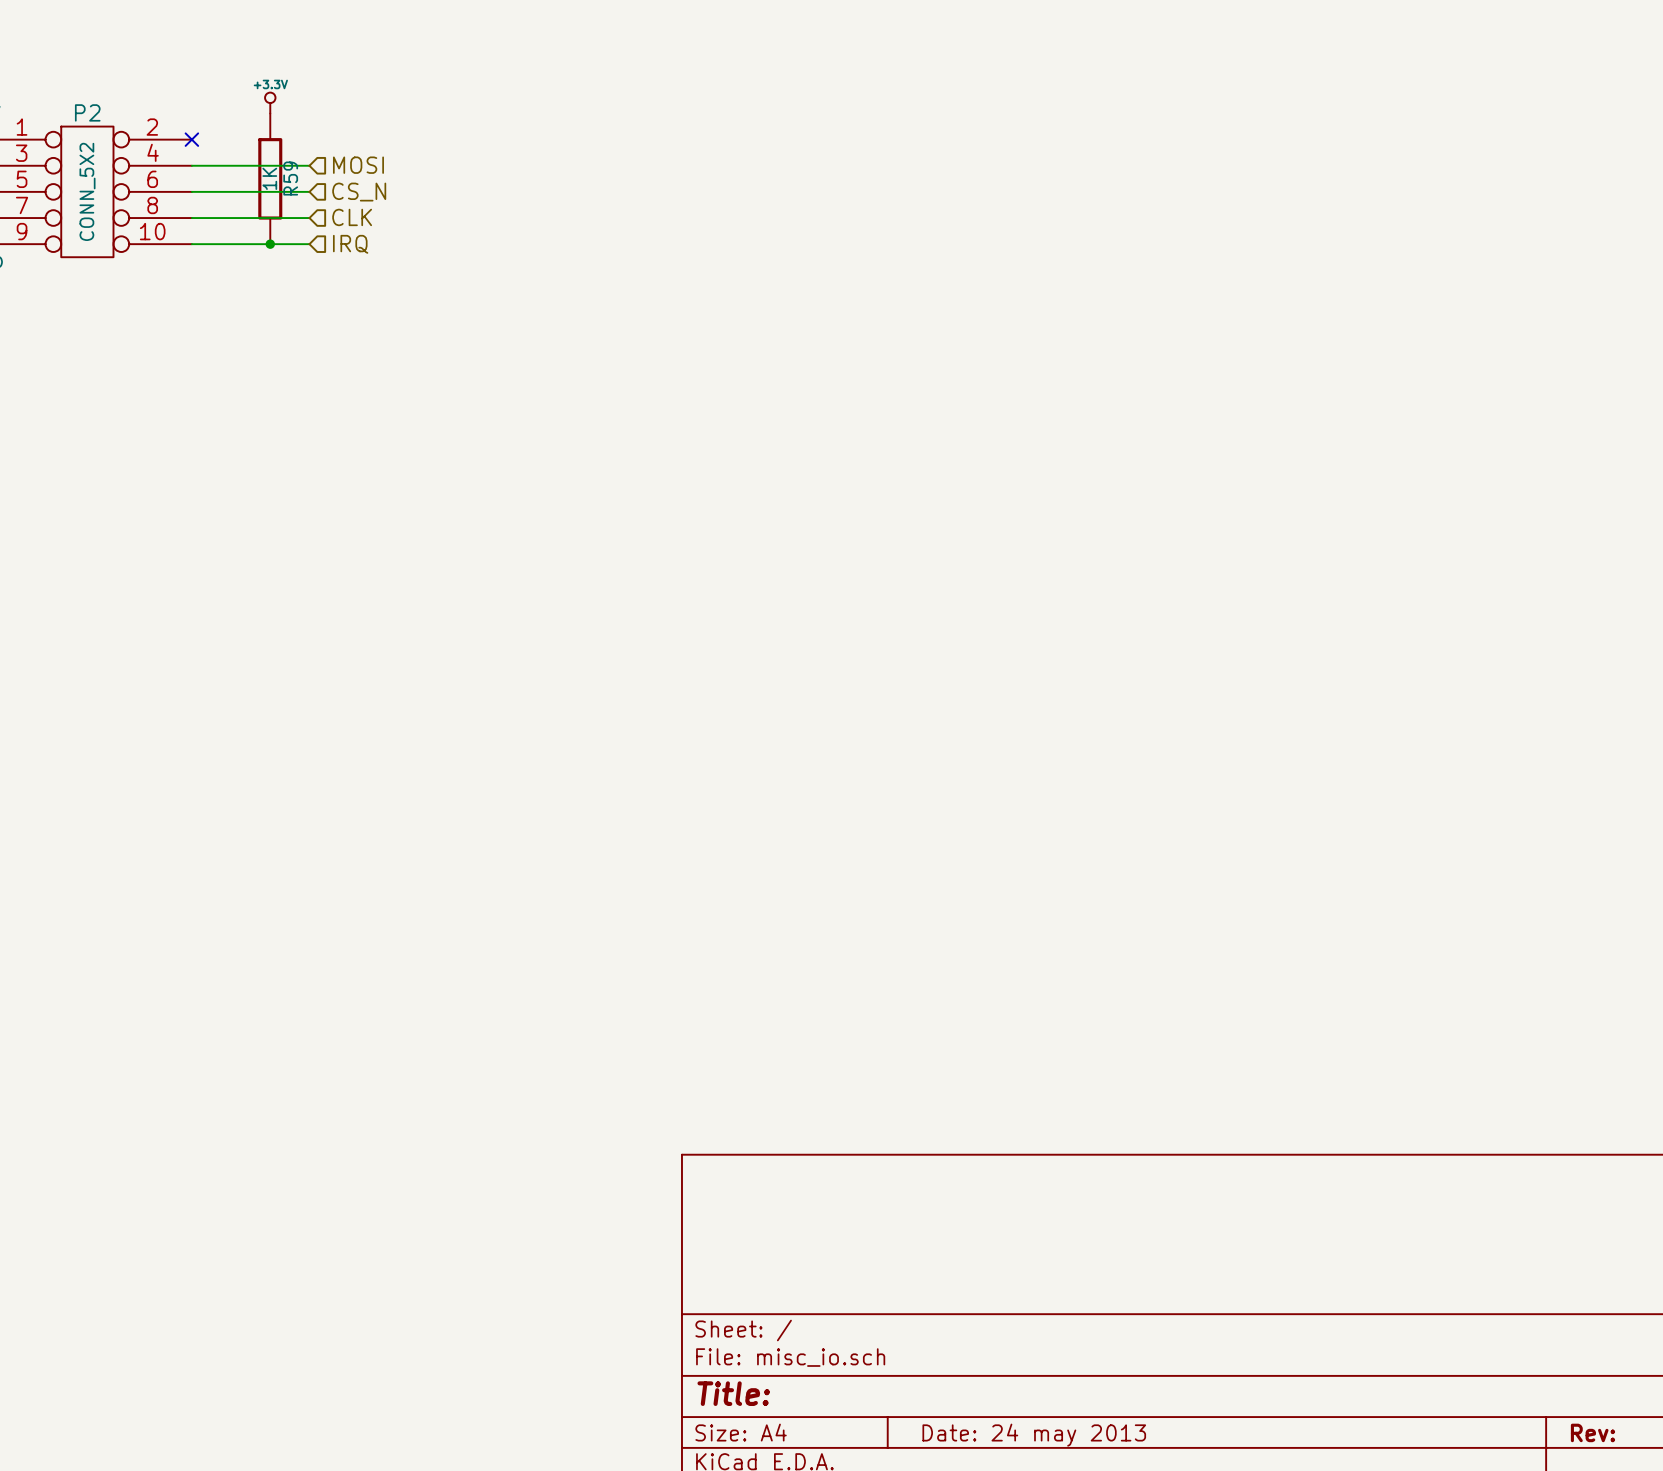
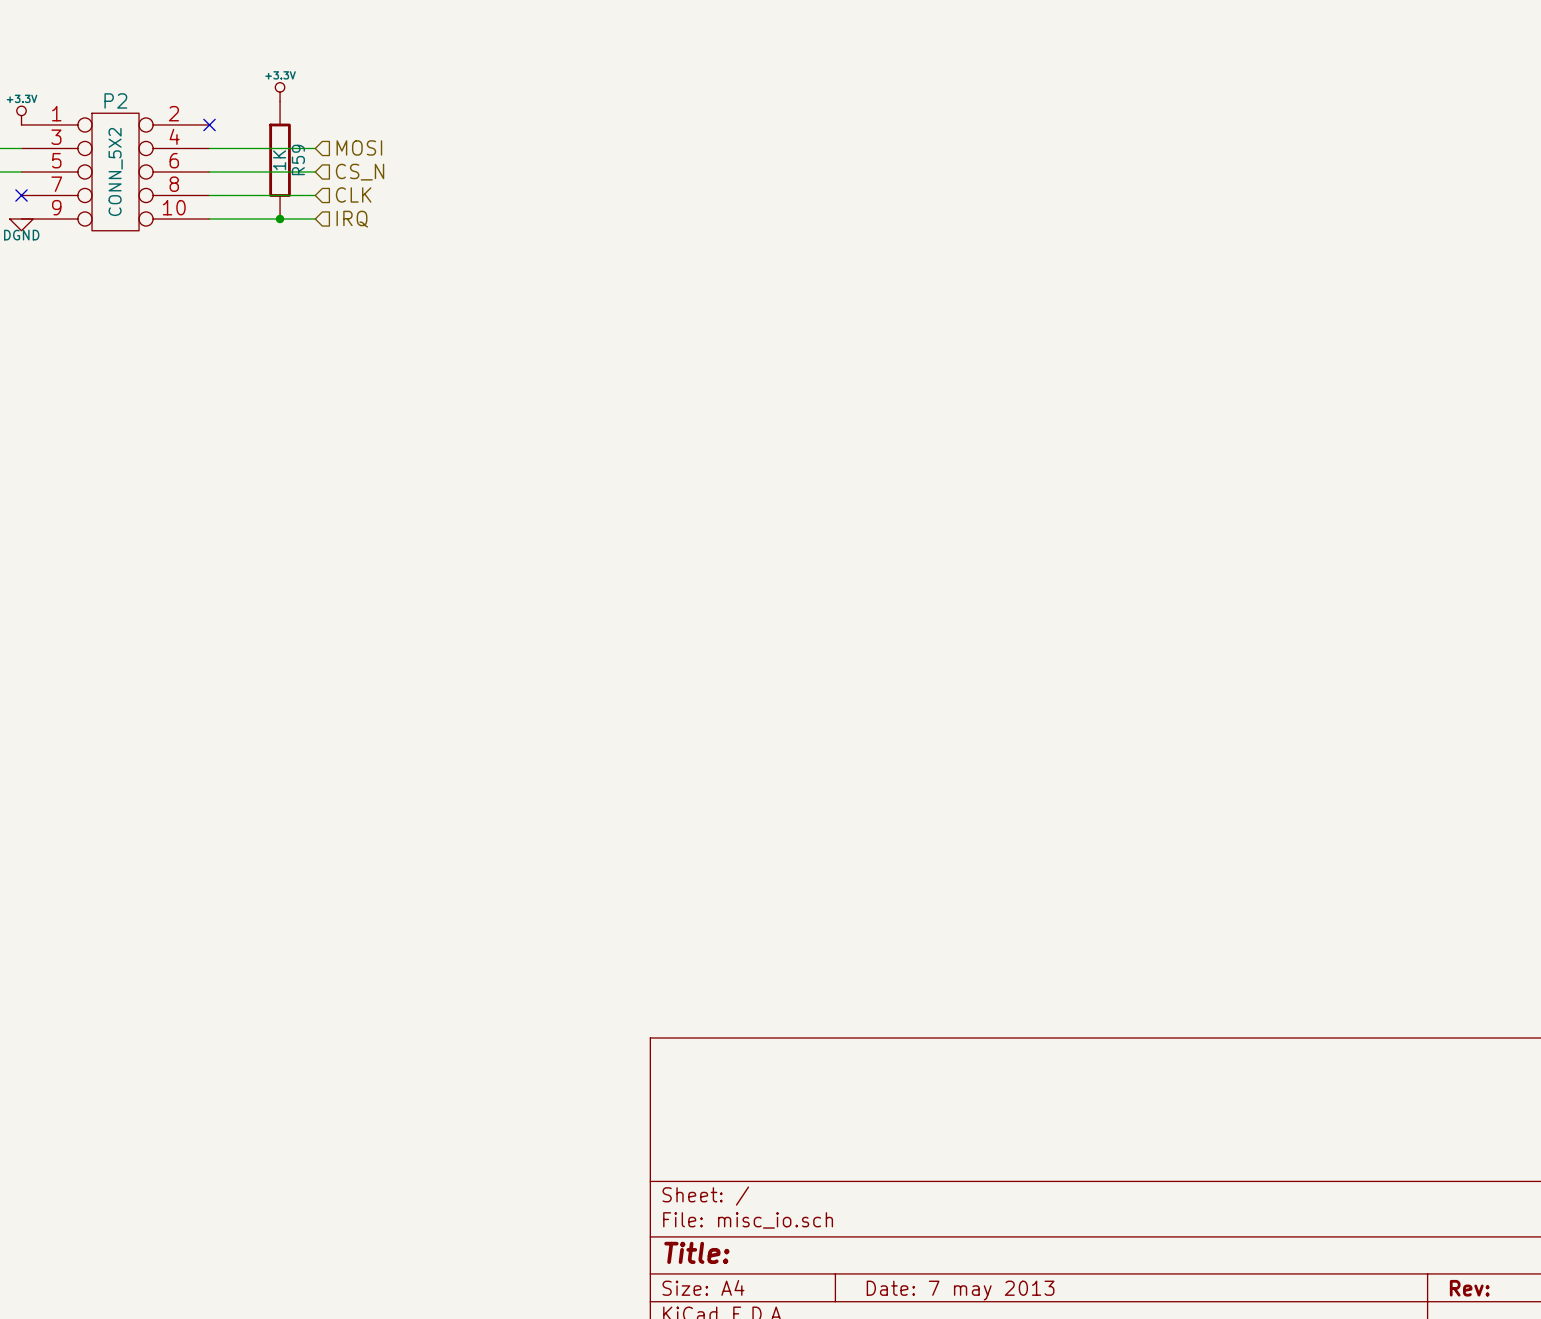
title block: Date: 24 may 2013 (1034, 1435) -> Date: 7 may 2013 (960, 1290)

